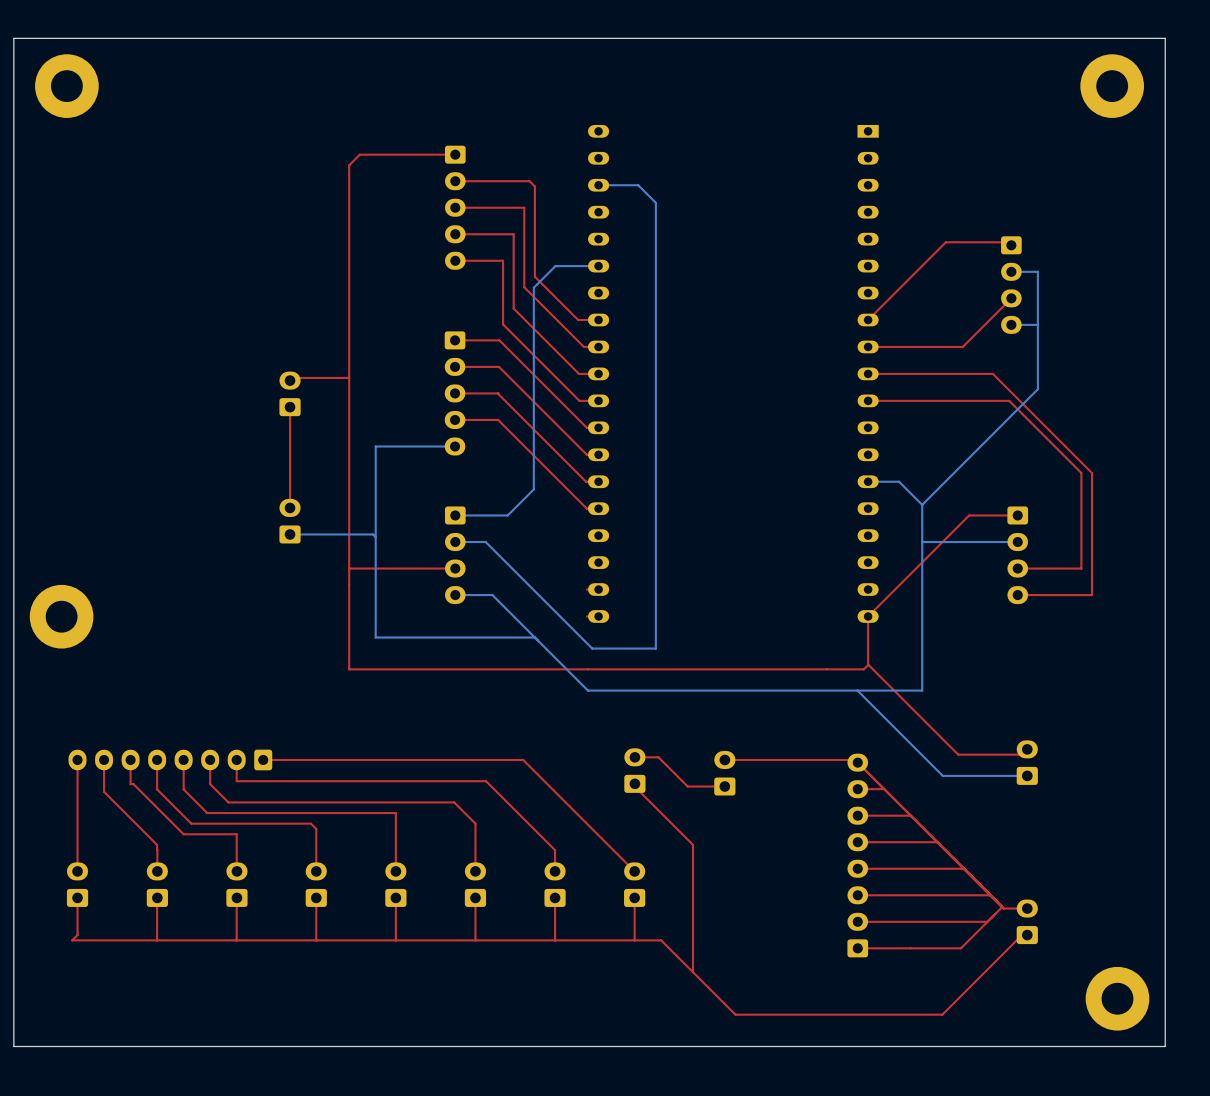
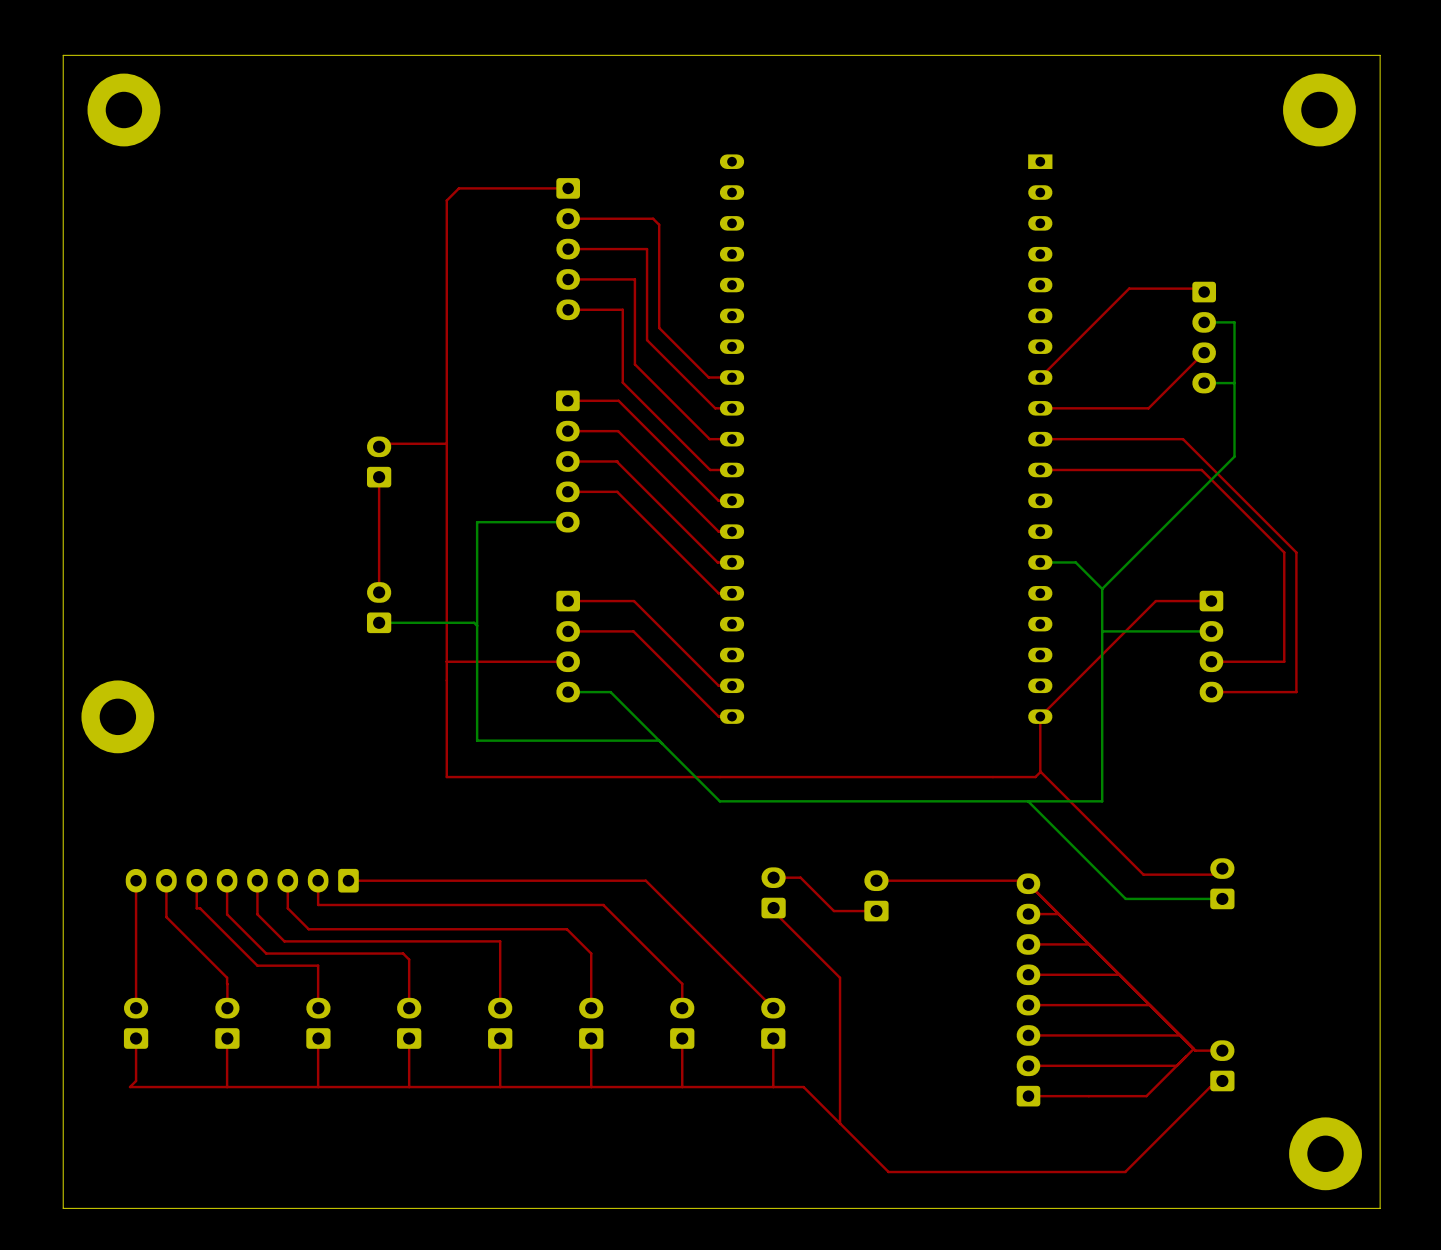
bottom track: (598, 185) (638, 185) (655, 202) (655, 648) (592, 648) (485, 542) (455, 542) -> none
bottom track: (598, 266) (555, 266) (533, 287) (533, 489) (507, 515) (455, 515) -> none
top track: none -> (568, 601) (634, 601) (718, 685)
top track: none -> (568, 631) (633, 631) (718, 716)

